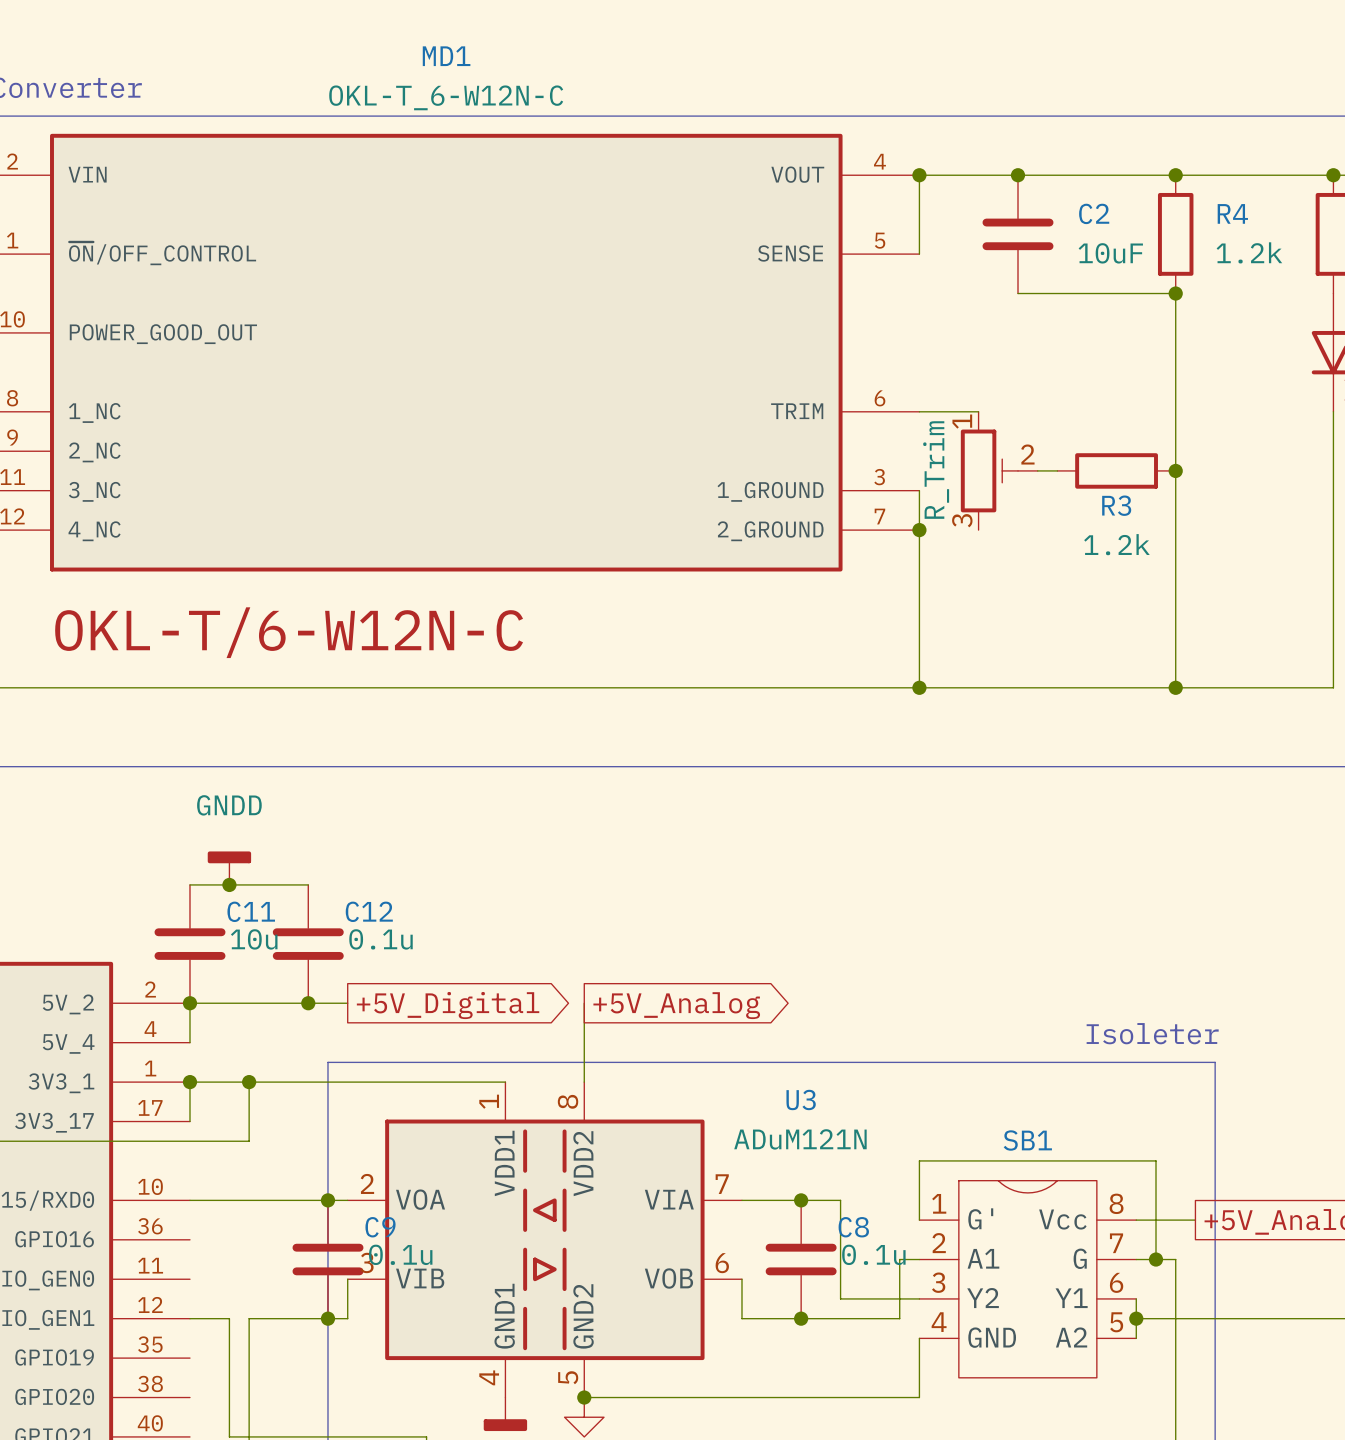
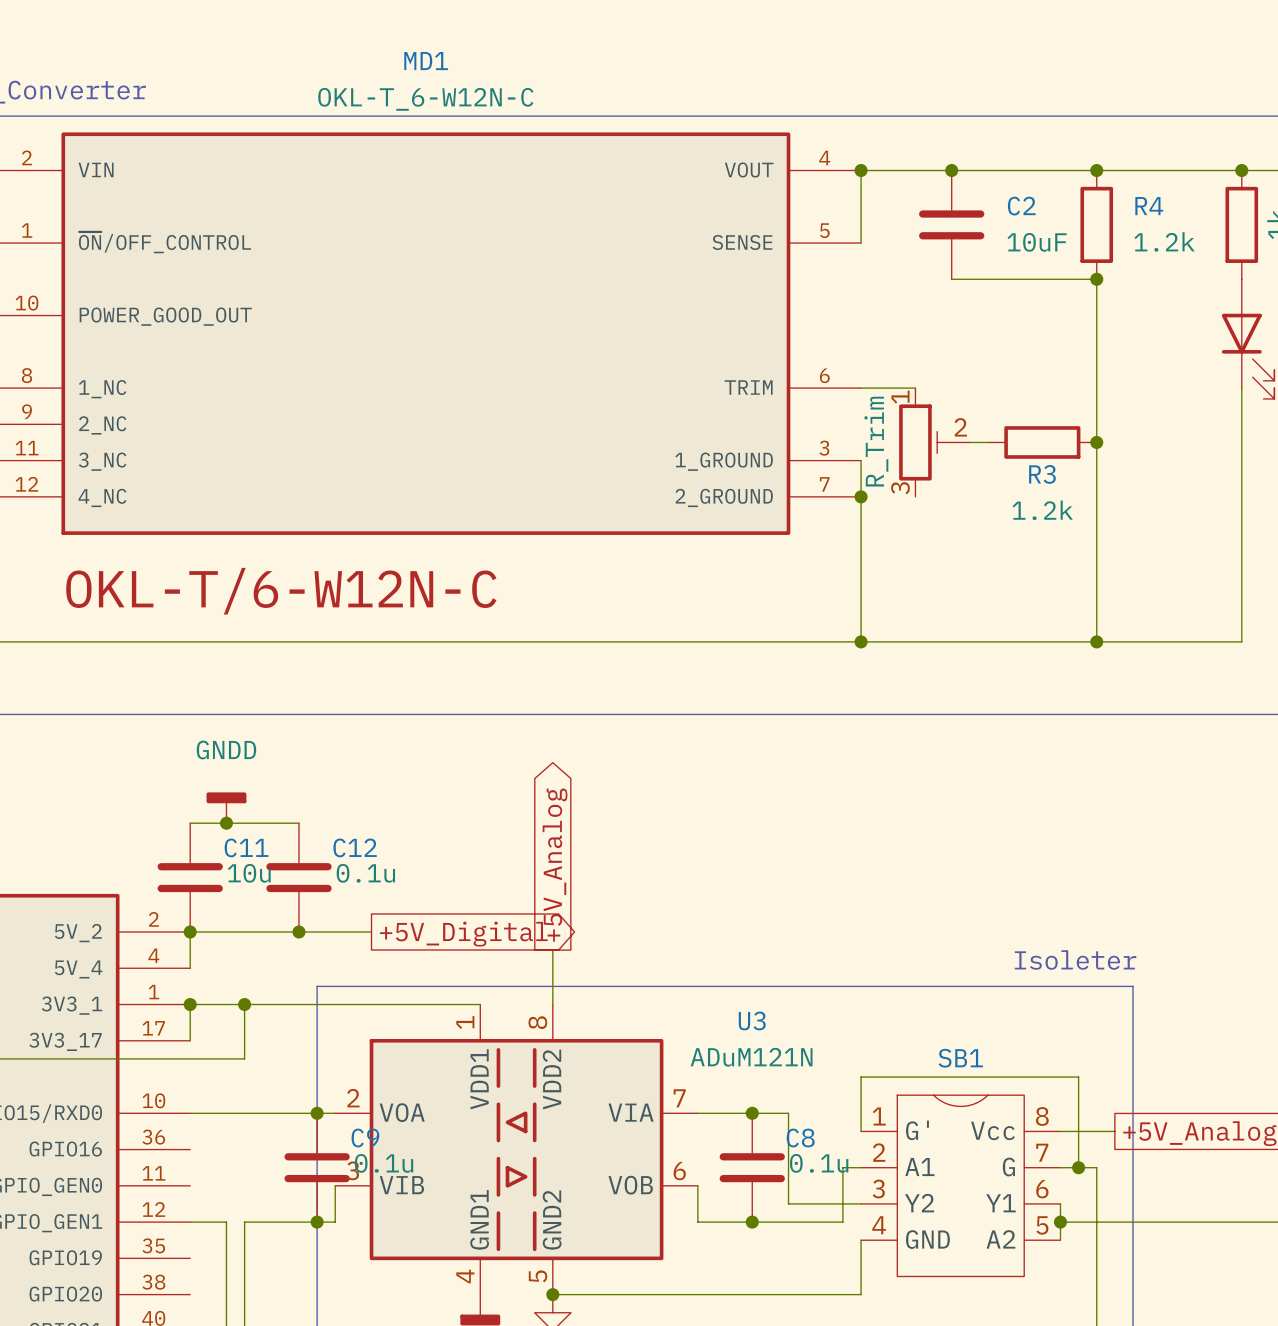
wire: none -> (335, 932) (371, 932)
global label position: +5V_Digital (448, 1005) -> +5V_Digital (463, 934)
global label rotation: 0° (676, 1005) -> 90° counterclockwise (555, 865)

